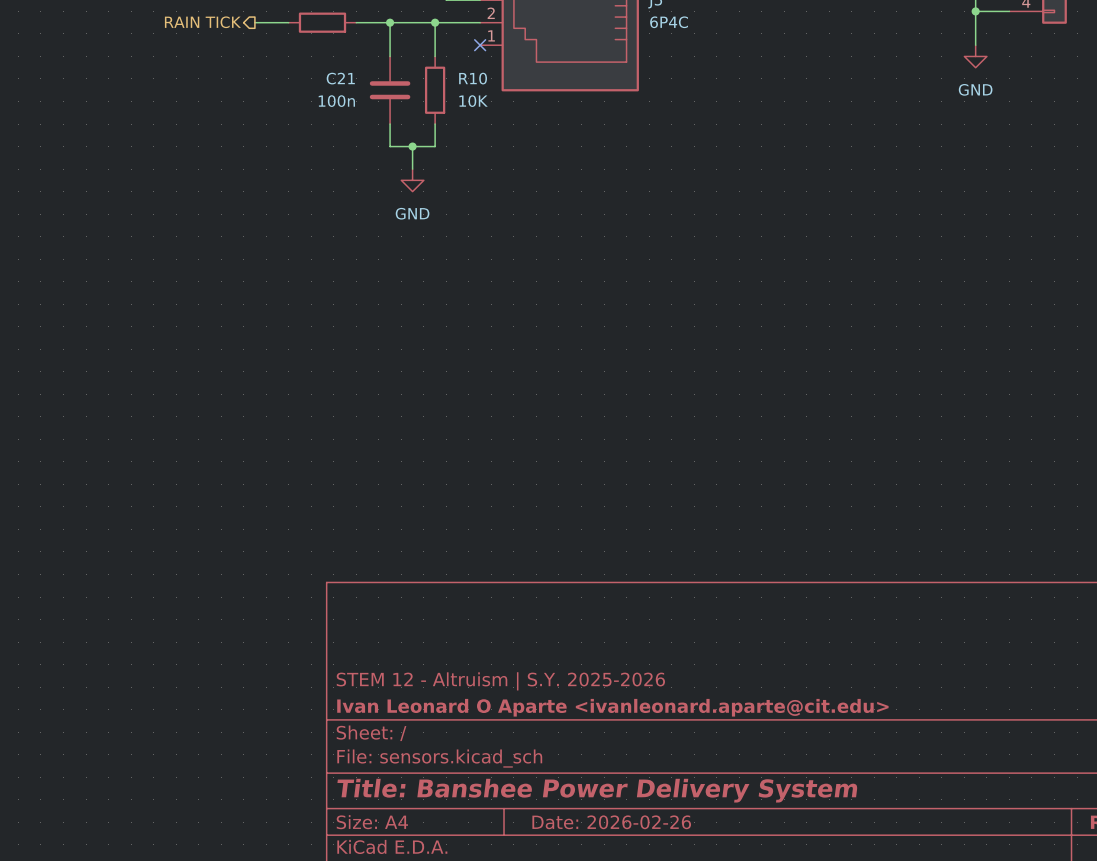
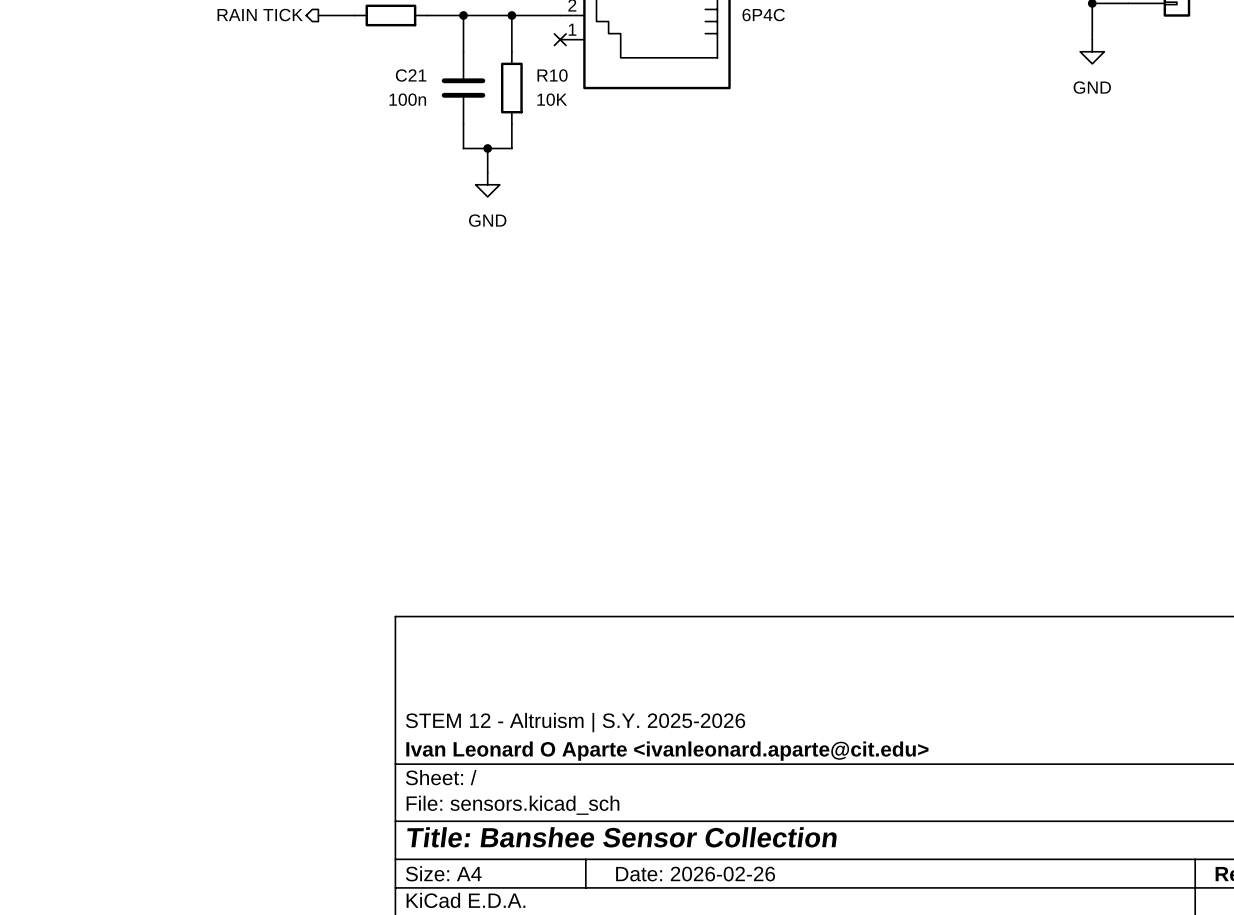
title block: Title: Banshee Power Delivery System (597, 790) -> Title: Banshee Sensor Collection (622, 837)

